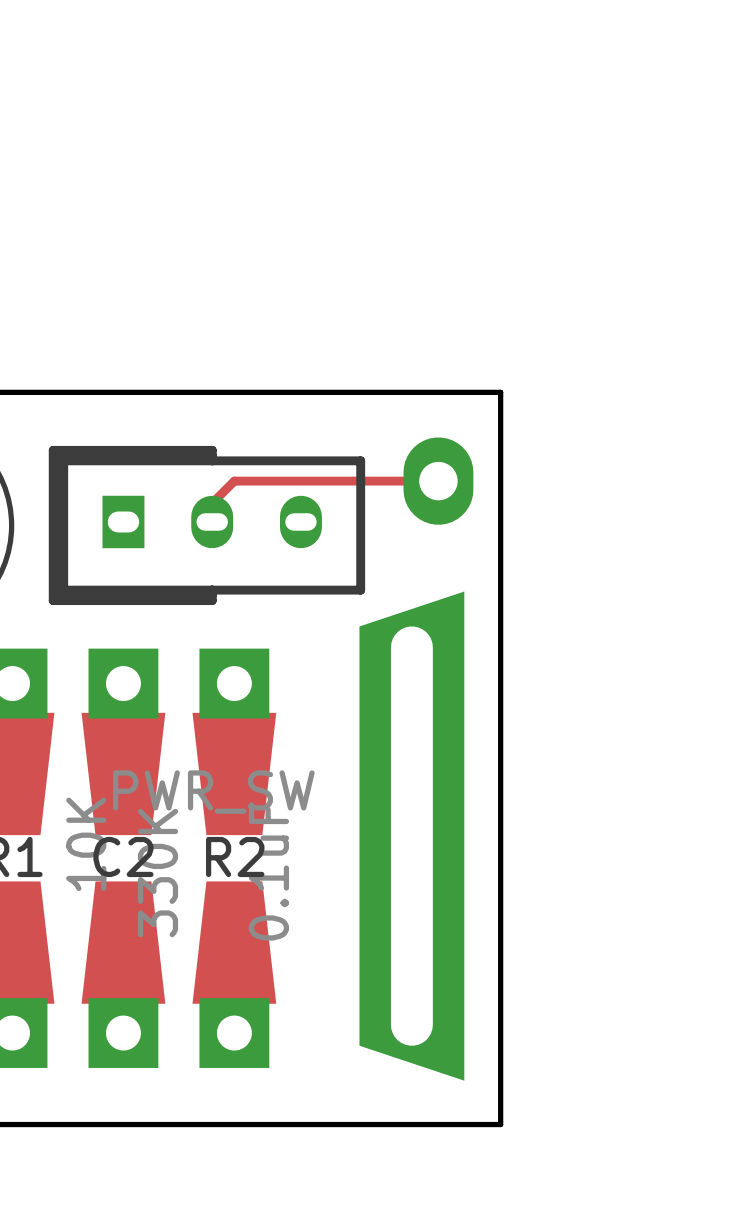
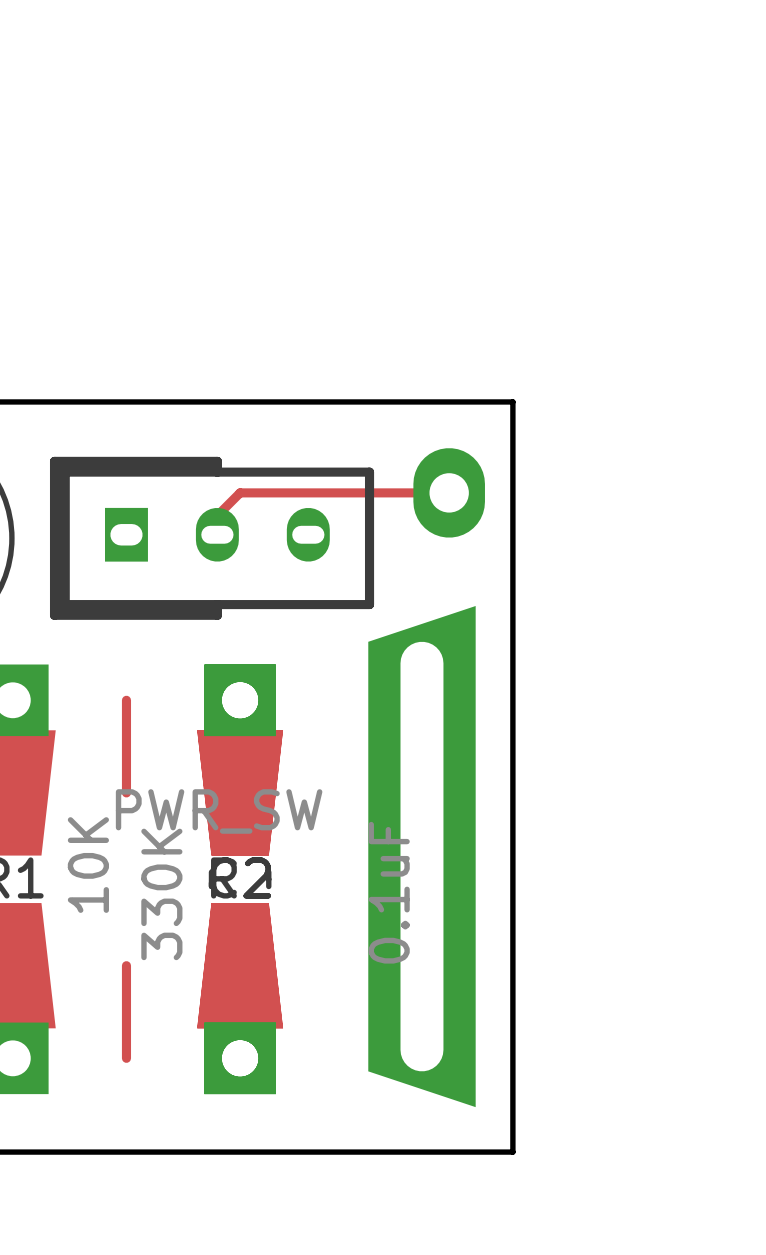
C2 footprint: [81, 648, 166, 1068] -> [197, 664, 284, 1095]

